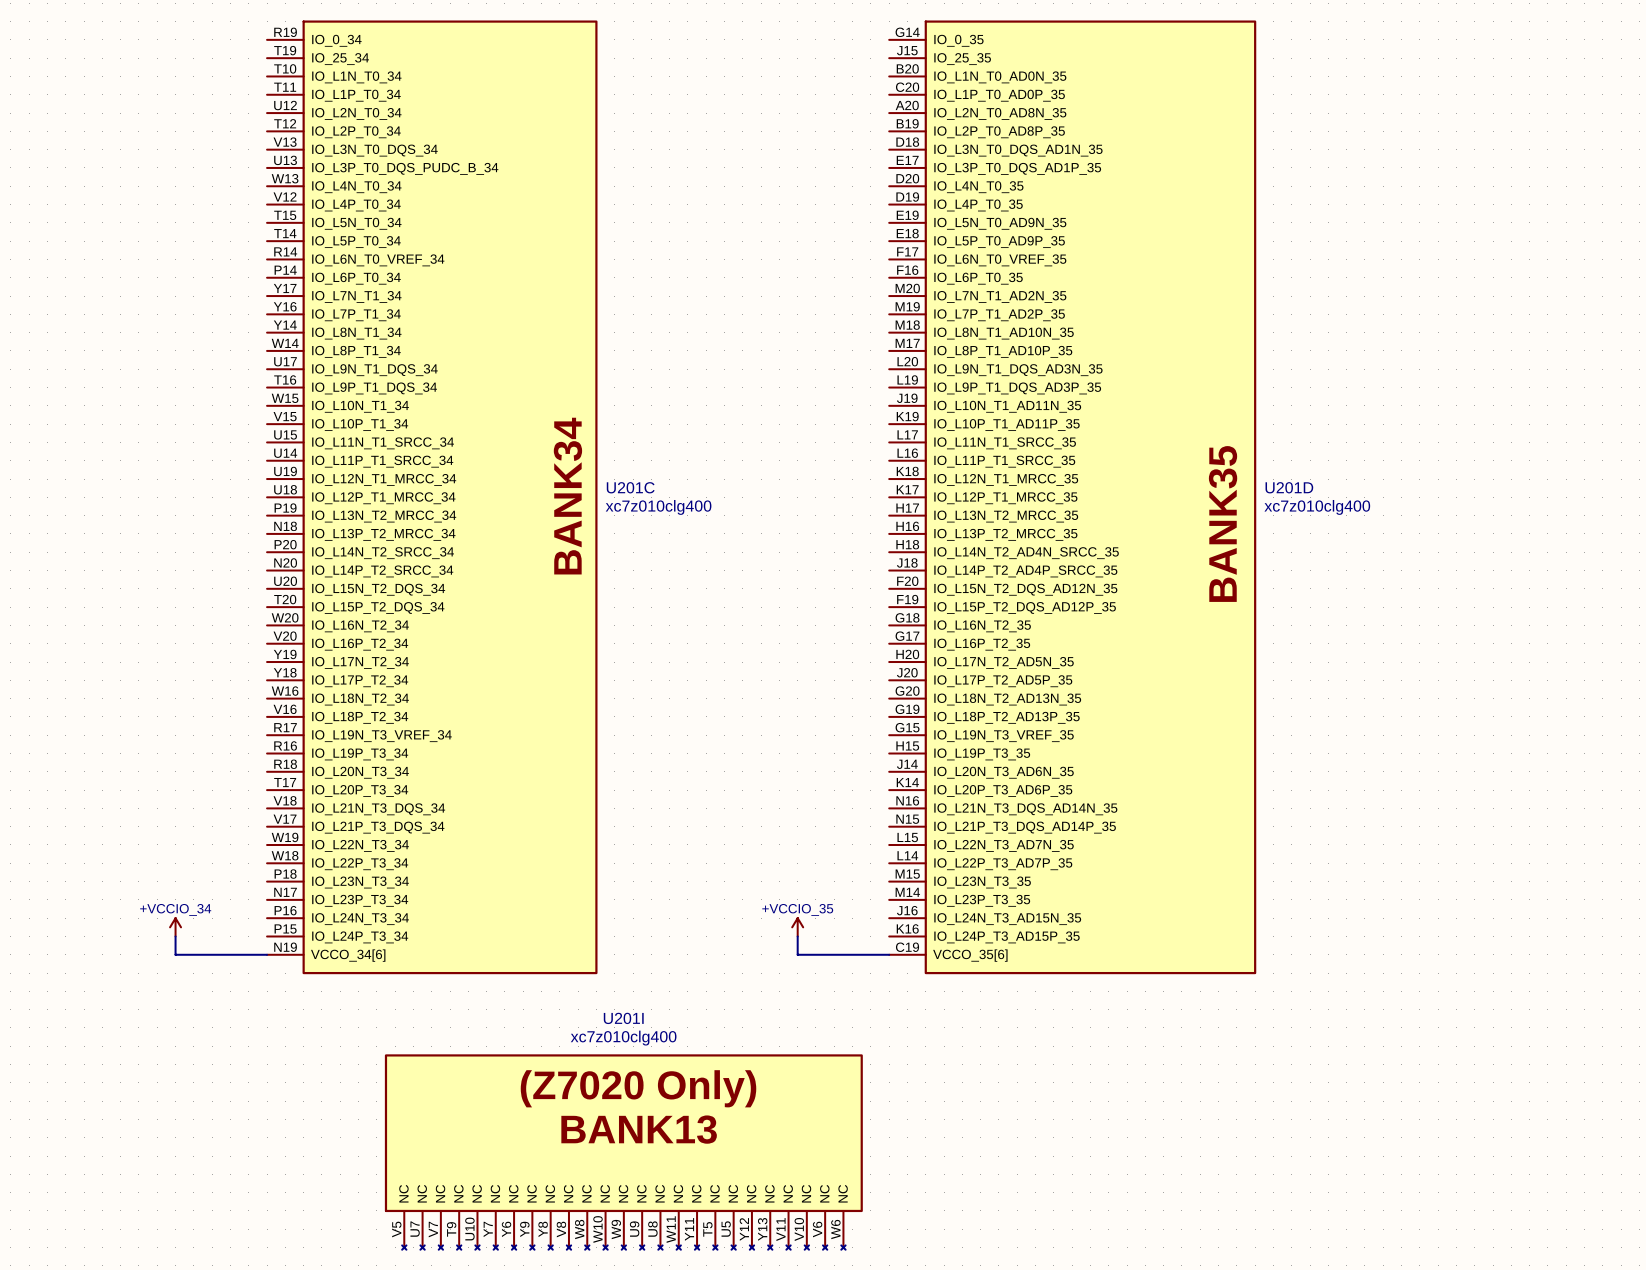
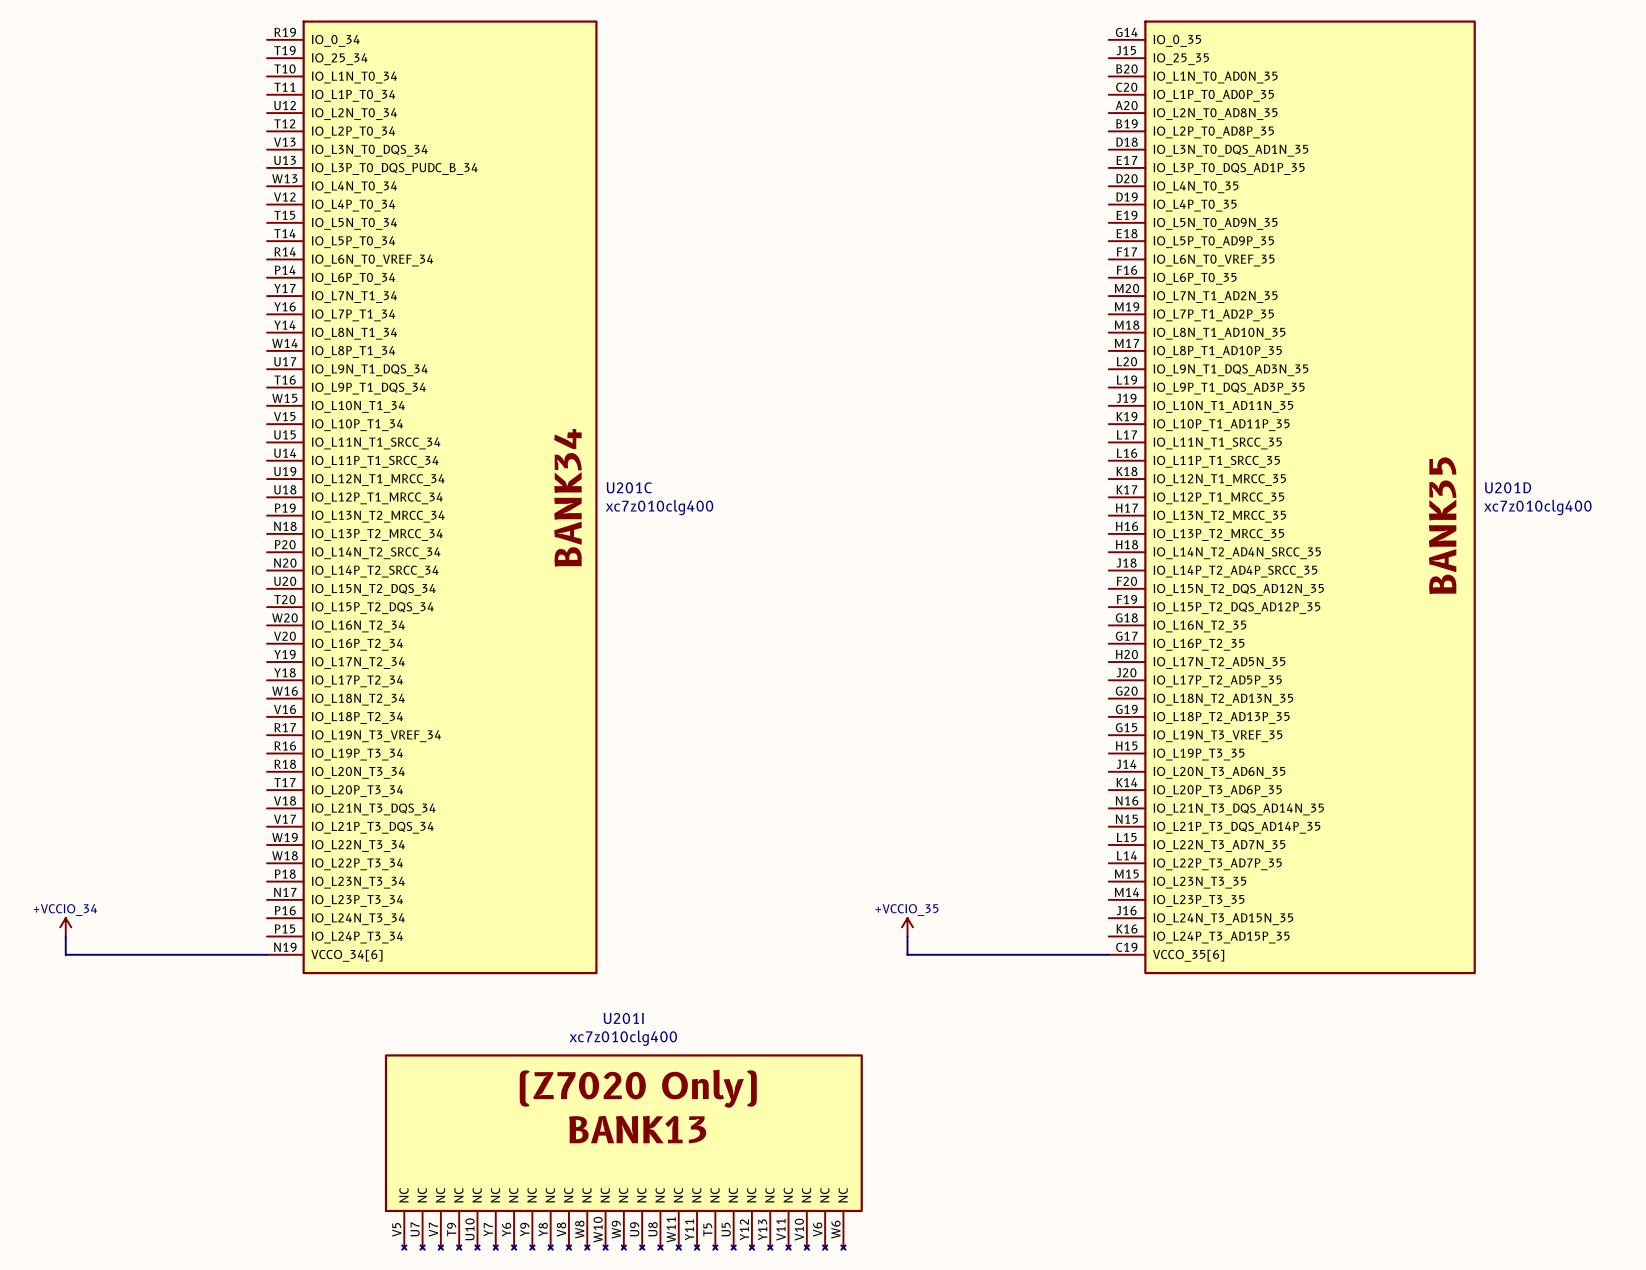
U201D position: (1072, 497) -> (1292, 497)
power symbol position: +VCCIO_34 (175, 927) -> +VCCIO_34 (65, 927)
power symbol position: +VCCIO_35 (797, 927) -> +VCCIO_35 (907, 927)
wire: (175, 936) (175, 954) -> (65, 936) (65, 954) (175, 954)
wire: (797, 936) (797, 954) (889, 954) -> none

